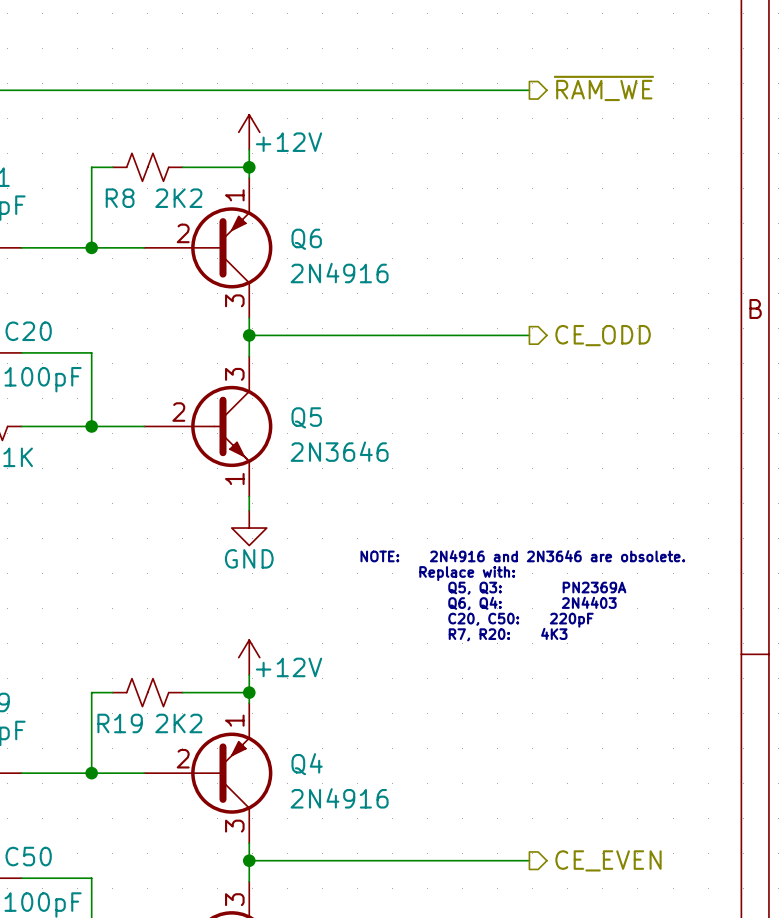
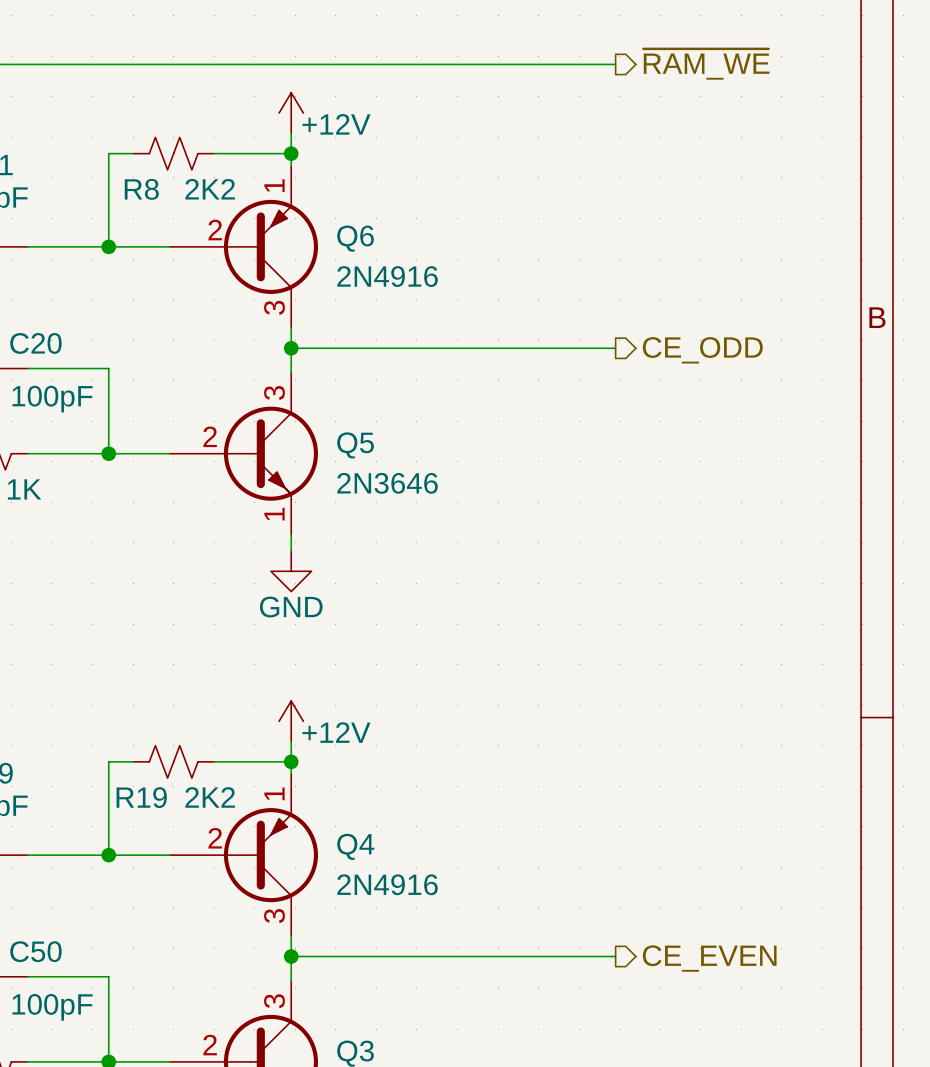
text: NOTE: 2N4916 and 2N3646 are obsolete. (522, 556) -> none
text: Replace with: (467, 573) -> none
text: Q5, Q3: PN2369A (537, 588) -> none
text: Q6, Q4: 2N4403 (532, 603) -> none
text: C20, C50: 220pF (520, 620) -> none
text: R7, R20: 4K3 (508, 634) -> none

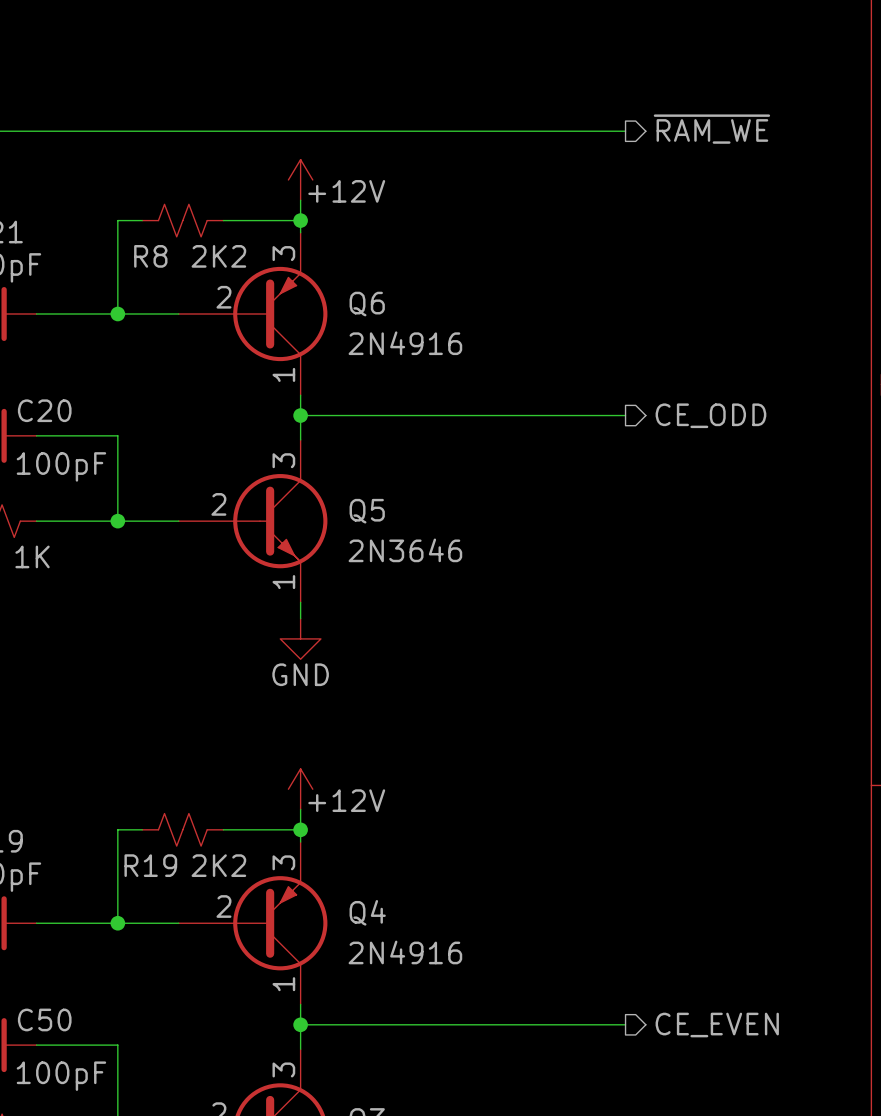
Q6 pin number: 1 (274, 185) -> 3 (283, 253)
Q6 pin number: 3 (274, 307) -> 1 (283, 374)
Q4 pin number: 1 (274, 793) -> 3 (283, 862)
Q4 pin number: 3 (274, 916) -> 1 (283, 984)

